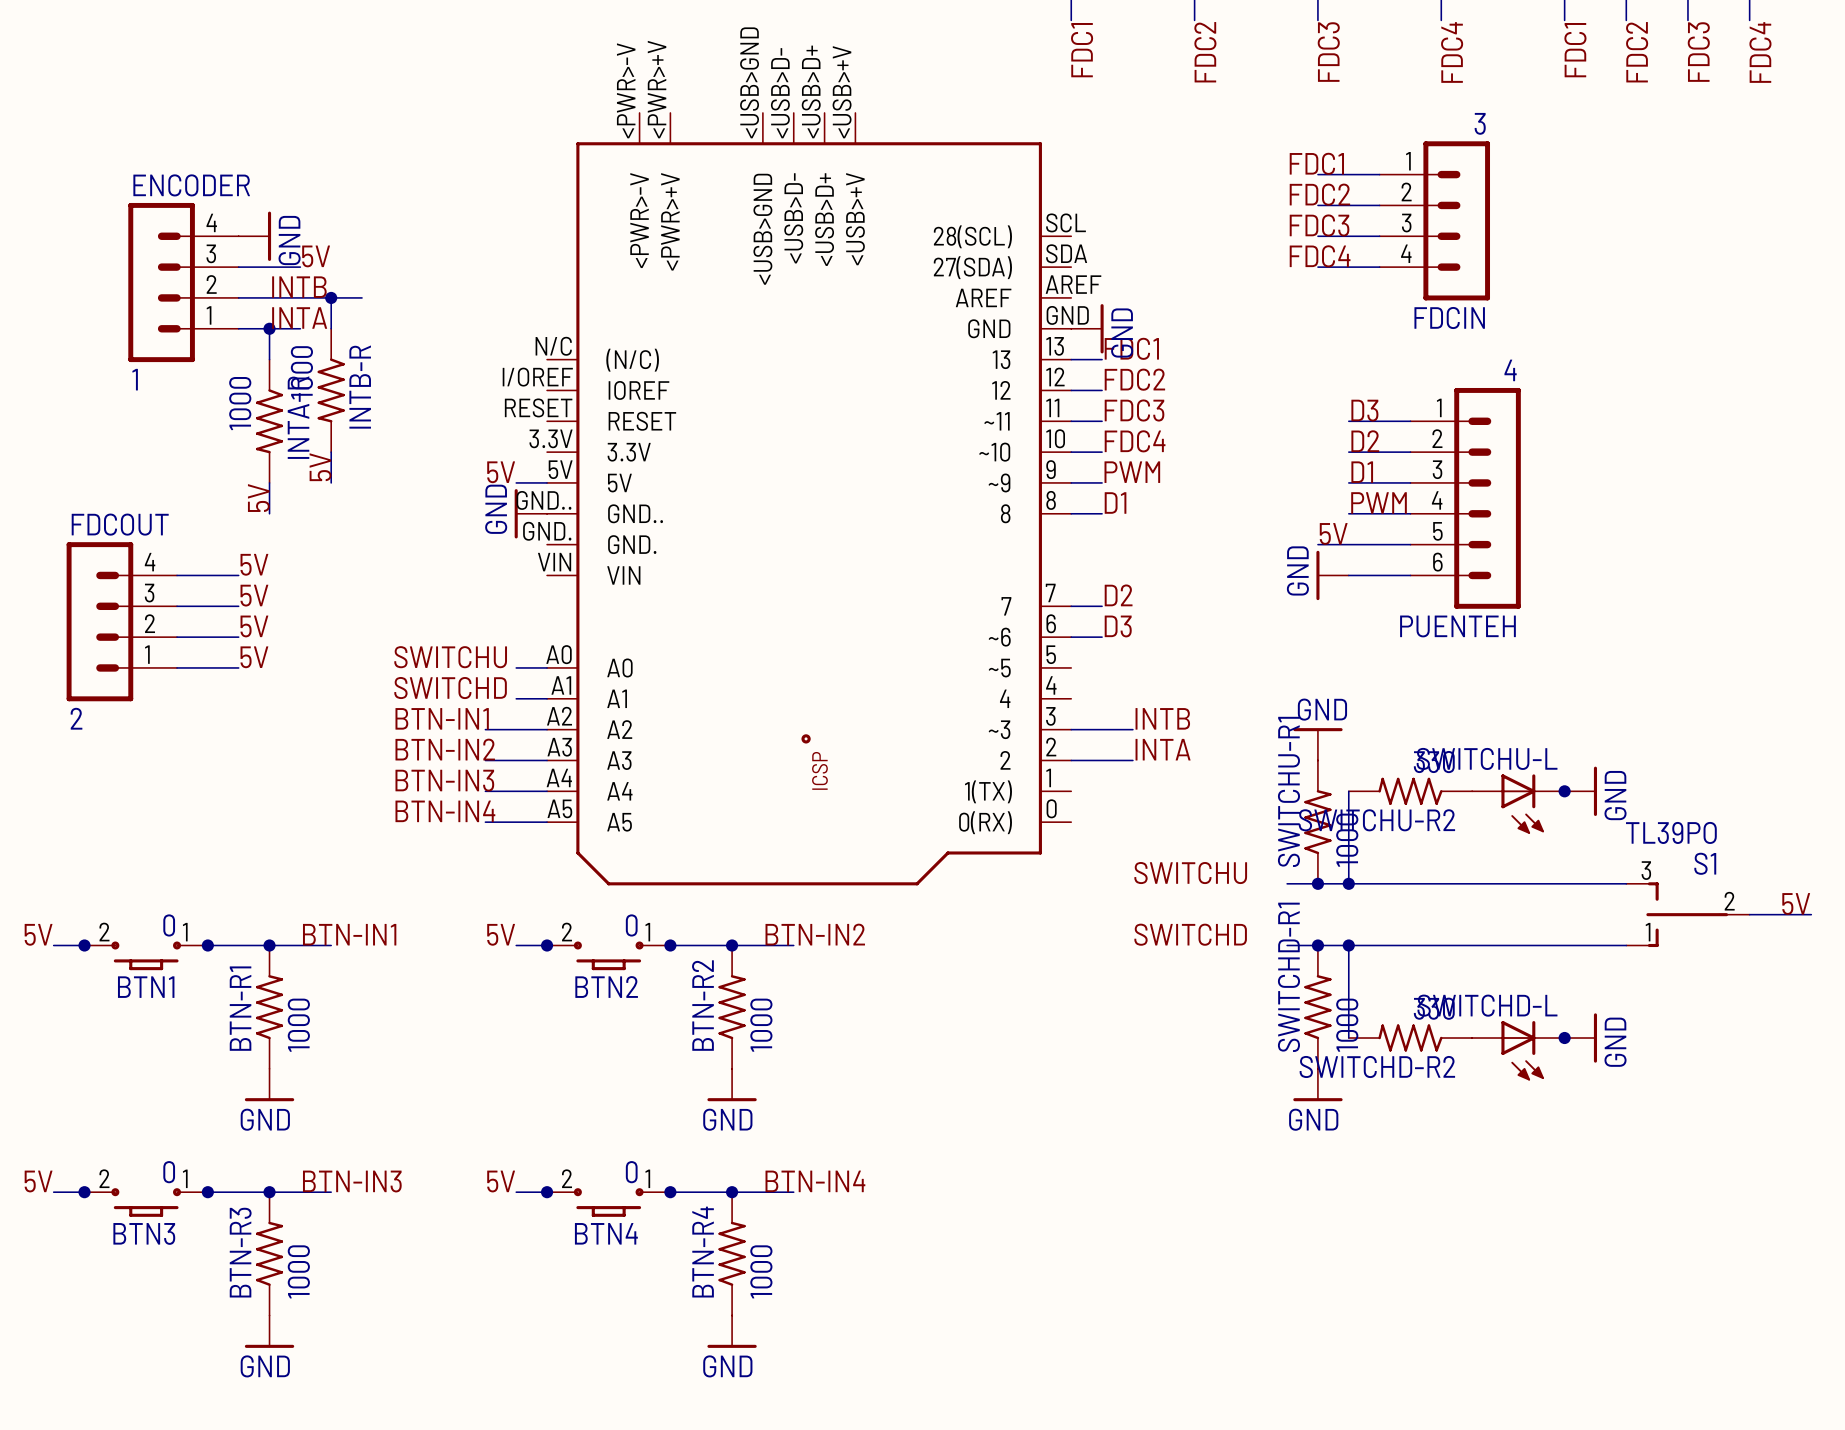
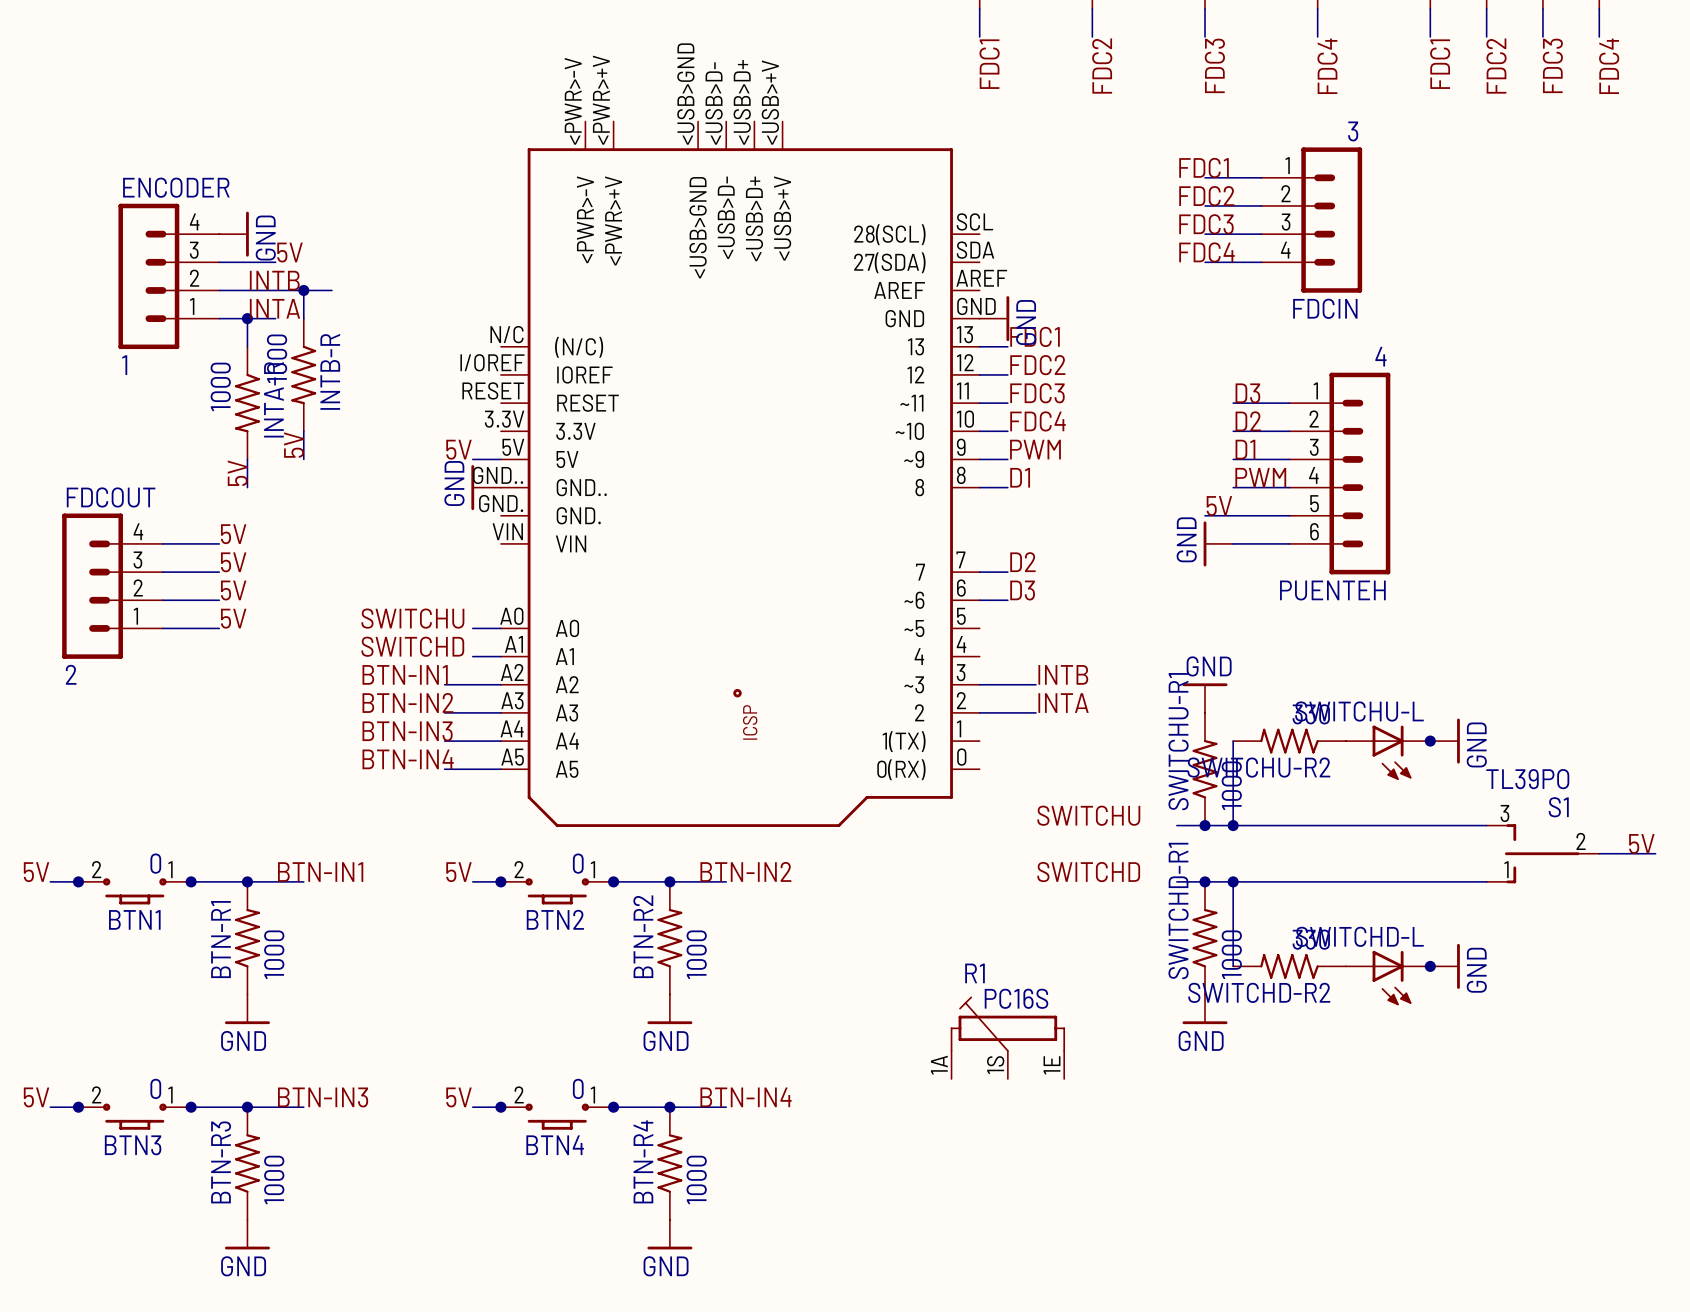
R1: none -> PC16S (1007, 1037)

